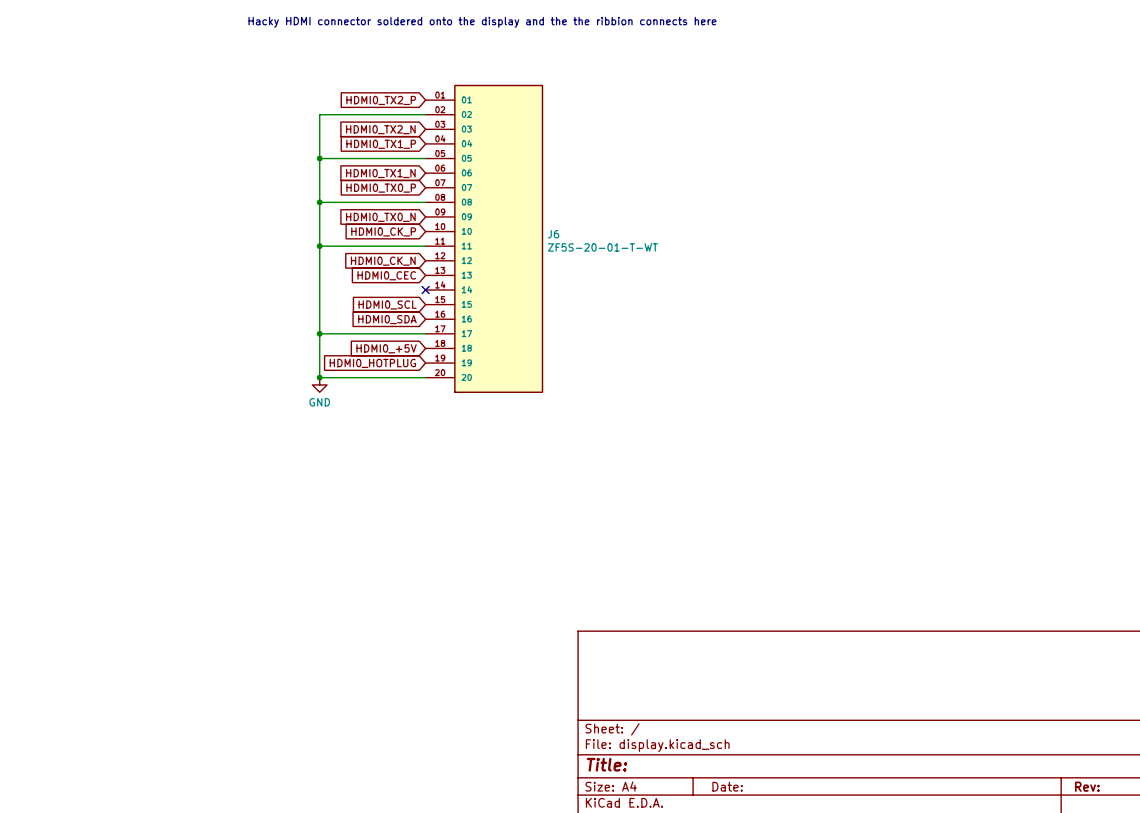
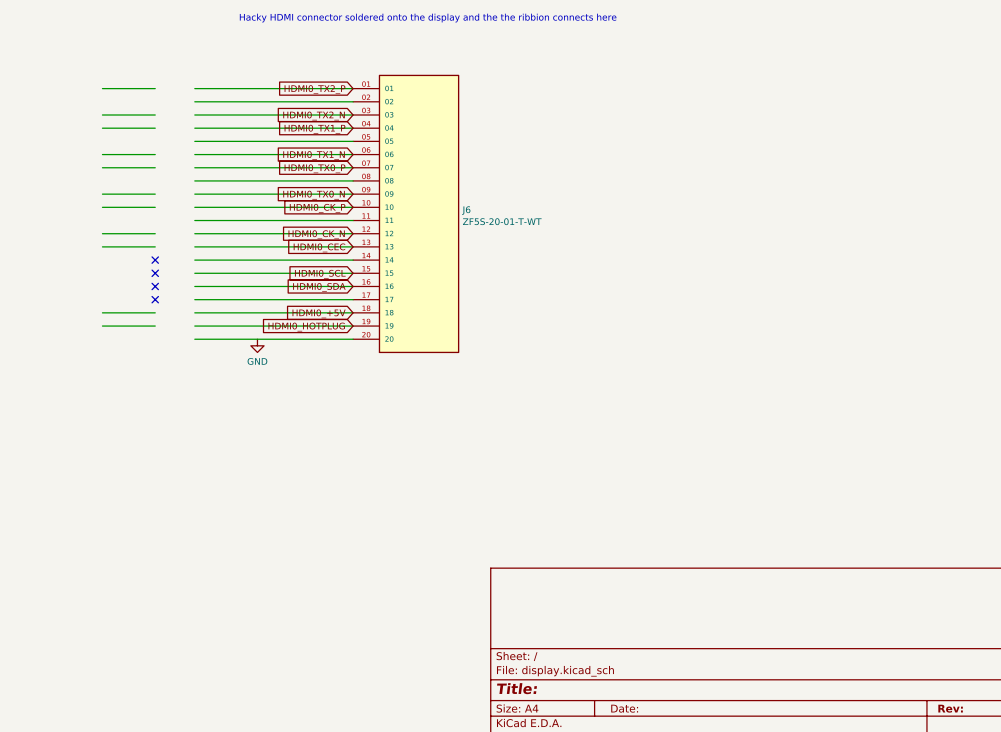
wire: none -> (102, 88) (155, 88)
wire: none -> (194, 88) (353, 88)
wire: (319, 114) (319, 377) -> (257, 101) (194, 101)
wire: none -> (102, 115) (155, 115)
wire: none -> (194, 115) (353, 115)
wire: none -> (102, 128) (155, 128)
wire: none -> (194, 128) (353, 128)
wire: none -> (194, 141) (257, 141)
junction: (319, 158) -> none
wire: none -> (102, 154) (155, 154)
wire: none -> (194, 154) (353, 154)
wire: none -> (102, 167) (155, 167)
wire: none -> (194, 167) (353, 167)
wire: none -> (194, 180) (257, 180)
junction: (319, 202) -> none
wire: none -> (102, 194) (155, 194)
wire: none -> (194, 194) (353, 194)
wire: none -> (102, 207) (155, 207)
wire: none -> (194, 207) (353, 207)
wire: none -> (194, 220) (257, 220)
junction: (319, 246) -> none
wire: none -> (102, 233) (155, 233)
wire: none -> (194, 233) (353, 233)
wire: none -> (102, 246) (155, 246)
wire: none -> (194, 246) (353, 246)
no-connect mark: none -> (155, 260)
wire: none -> (194, 260) (353, 260)
no-connect mark: (425, 290) -> none
no-connect mark: none -> (155, 273)
wire: none -> (194, 273) (353, 273)
no-connect mark: none -> (155, 286)
wire: none -> (194, 286) (353, 286)
no-connect mark: none -> (155, 299)
wire: none -> (194, 299) (257, 299)
junction: (319, 333) -> none
wire: none -> (102, 312) (155, 312)
wire: none -> (194, 312) (353, 312)
wire: none -> (102, 326) (155, 326)
wire: none -> (194, 326) (353, 326)
wire: none -> (194, 339) (257, 339)
junction: (319, 377) -> none

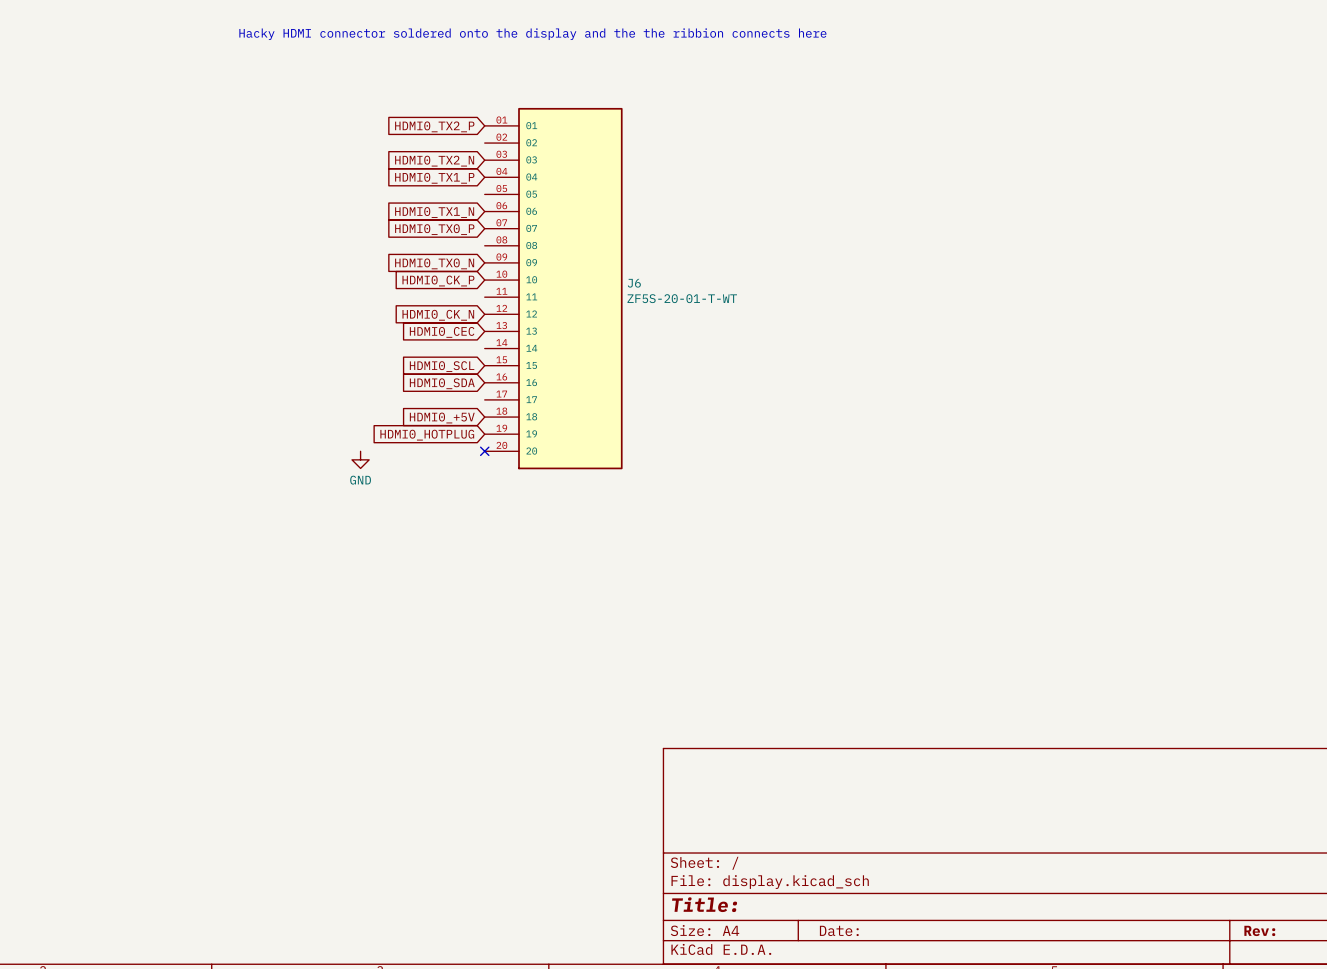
wire: (102, 88) (155, 88) -> none
wire: (194, 88) (353, 88) -> none
wire: (194, 101) (353, 101) -> none
wire: (102, 115) (155, 115) -> none
wire: (194, 115) (353, 115) -> none
wire: (102, 128) (155, 128) -> none
wire: (194, 128) (353, 128) -> none
wire: (194, 141) (353, 141) -> none
wire: (102, 154) (155, 154) -> none
wire: (194, 154) (353, 154) -> none
wire: (102, 167) (155, 167) -> none
wire: (194, 167) (353, 167) -> none
wire: (194, 180) (353, 180) -> none
wire: (102, 194) (155, 194) -> none
wire: (194, 194) (353, 194) -> none
wire: (102, 207) (155, 207) -> none
wire: (194, 207) (353, 207) -> none
wire: (194, 220) (353, 220) -> none
wire: (102, 233) (155, 233) -> none
wire: (194, 233) (353, 233) -> none
wire: (102, 246) (155, 246) -> none
wire: (194, 246) (353, 246) -> none
no-connect mark: (155, 260) -> none
wire: (194, 260) (353, 260) -> none
no-connect mark: (155, 273) -> none
wire: (194, 273) (353, 273) -> none
no-connect mark: (155, 286) -> none
wire: (194, 286) (353, 286) -> none
no-connect mark: (155, 299) -> none
wire: (194, 299) (353, 299) -> none
wire: (102, 312) (155, 312) -> none
wire: (194, 312) (353, 312) -> none
wire: (102, 326) (155, 326) -> none
wire: (194, 326) (353, 326) -> none
wire: (194, 339) (353, 339) -> none
no-connect mark: none -> (484, 451)

